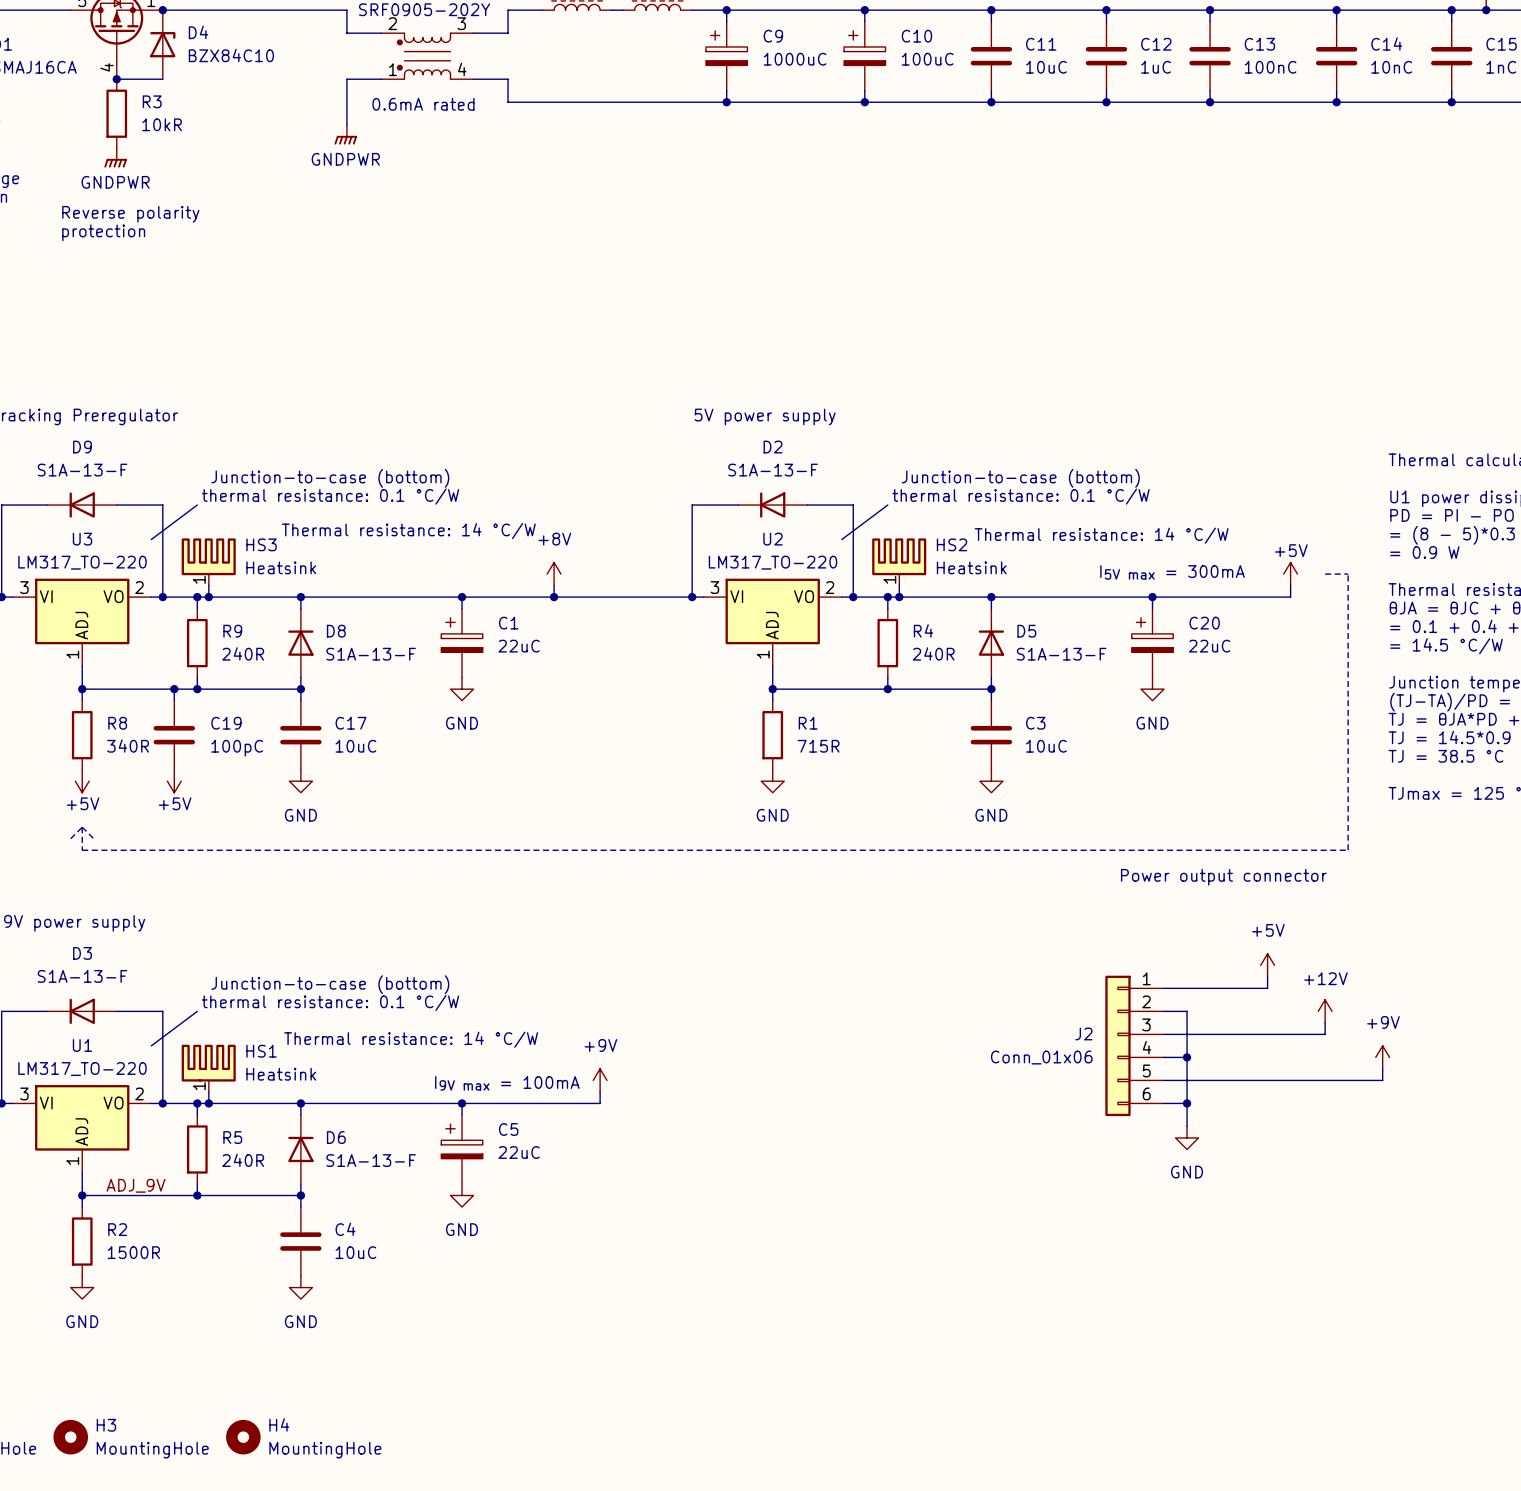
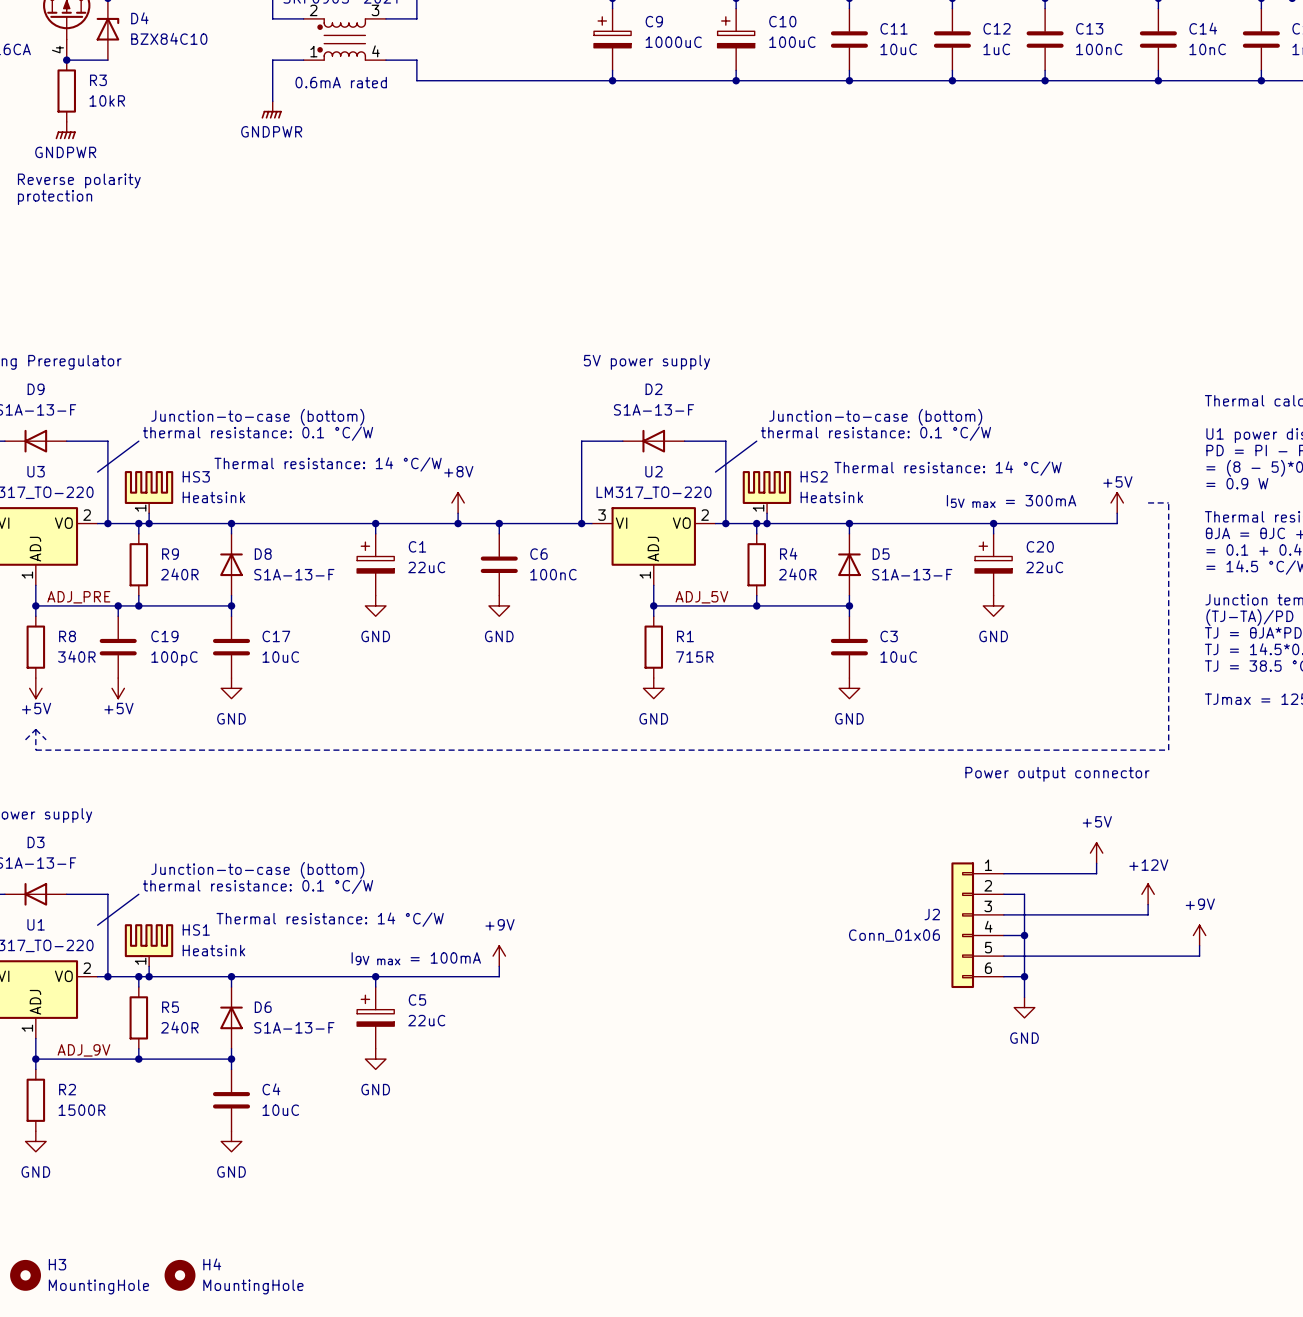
wire: none -> (499, 523) (499, 533)
junction: none -> (499, 523)
C6: none -> 100nC (499, 564)
label: none -> ADJ_PRE (78, 597)
label: none -> ADJ_5V (701, 597)
power symbol: none -> GND (499, 605)

